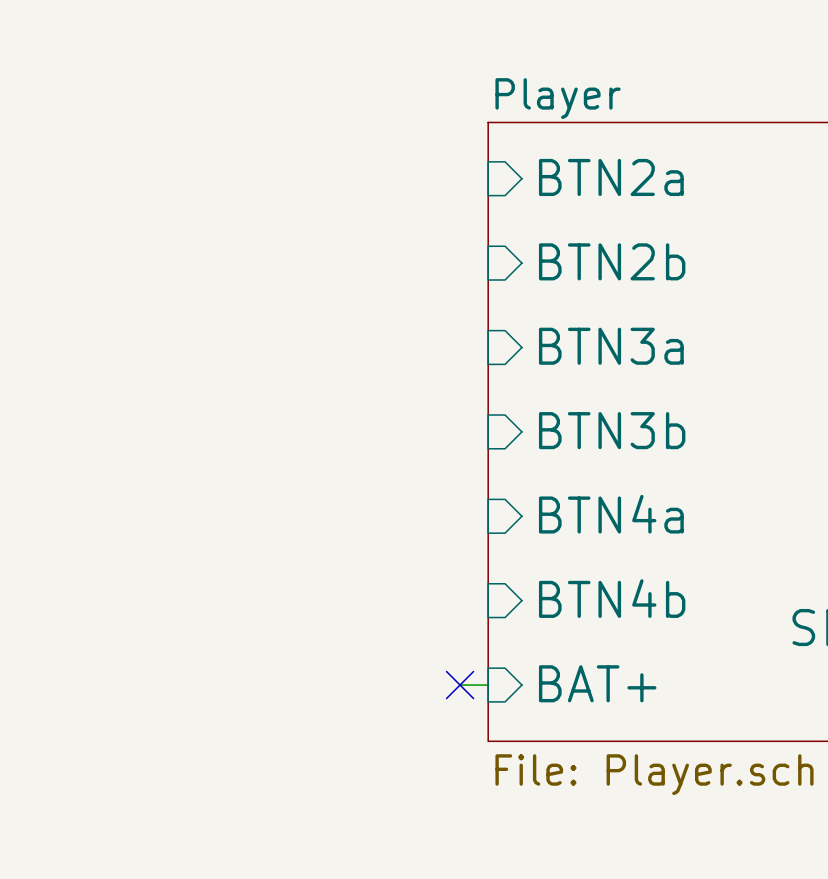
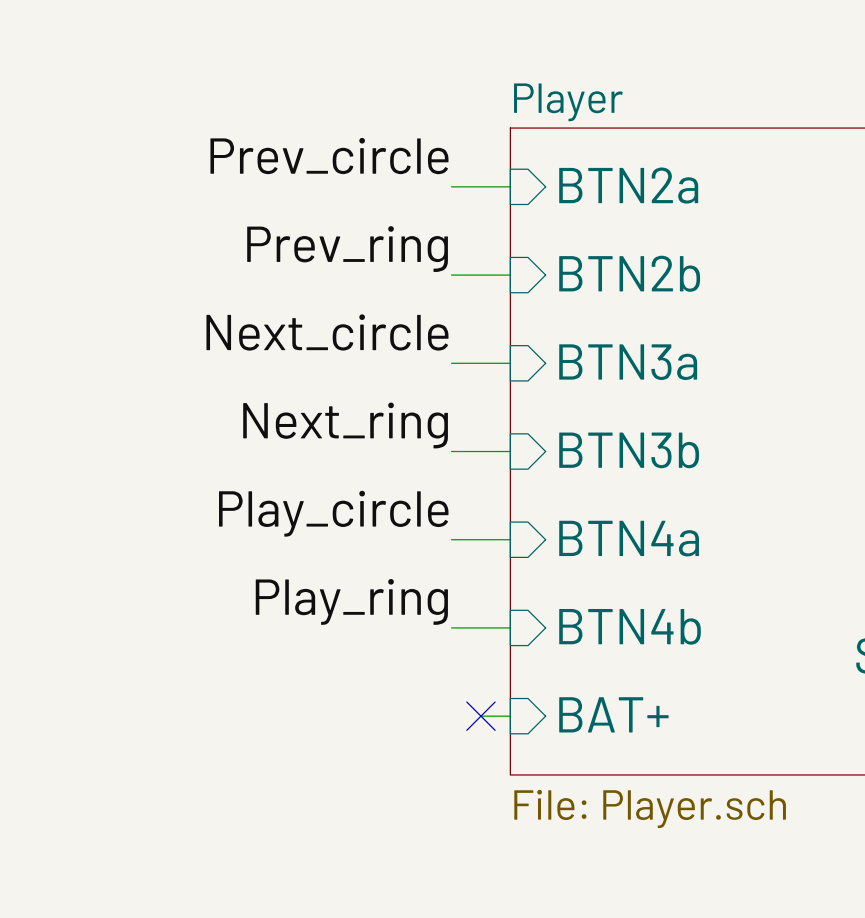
label: none -> Prev_circle (329, 156)
wire: none -> (451, 186) (510, 186)
label: none -> Prev_ring (347, 249)
wire: none -> (451, 275) (510, 275)
label: none -> Next_circle (327, 332)
wire: none -> (451, 363) (510, 363)
label: none -> Next_ring (345, 425)
wire: none -> (451, 451) (510, 451)
label: none -> Play_circle (333, 513)
wire: none -> (451, 539) (510, 539)
label: none -> Play_ring (351, 601)
wire: none -> (451, 627) (510, 627)

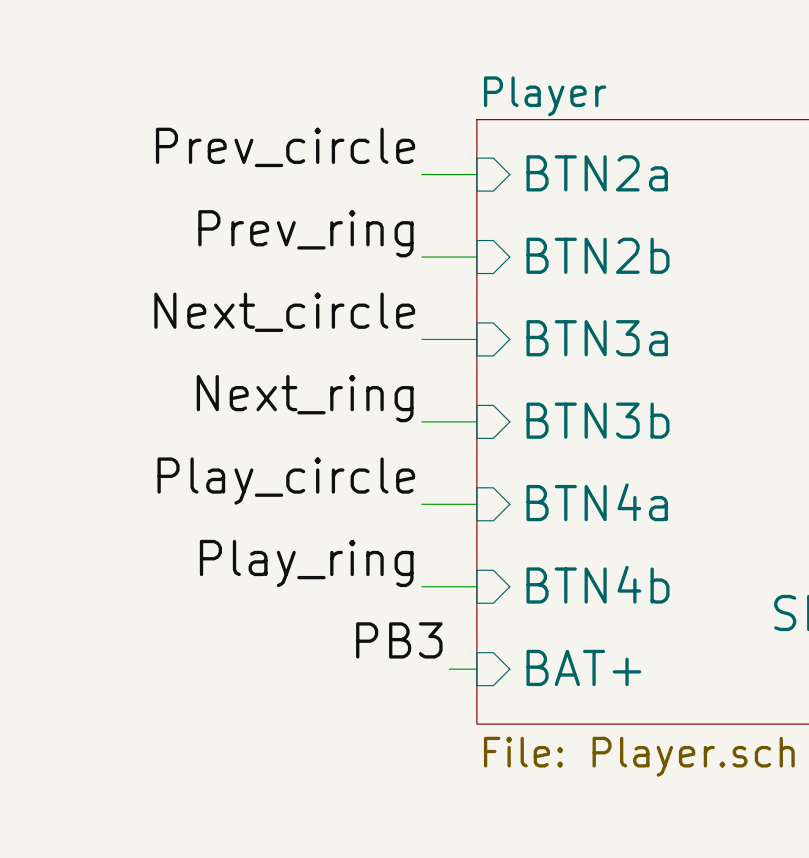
label: none -> PB3 (399, 640)
no-connect mark: (480, 716) -> none

